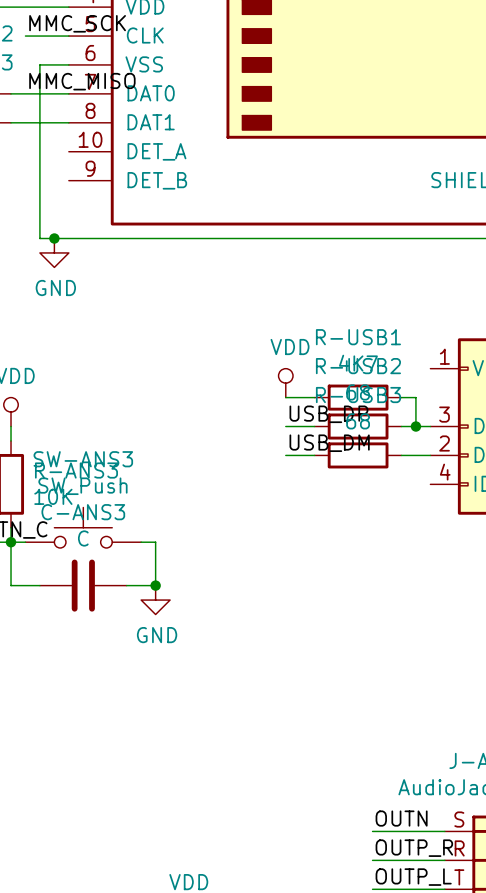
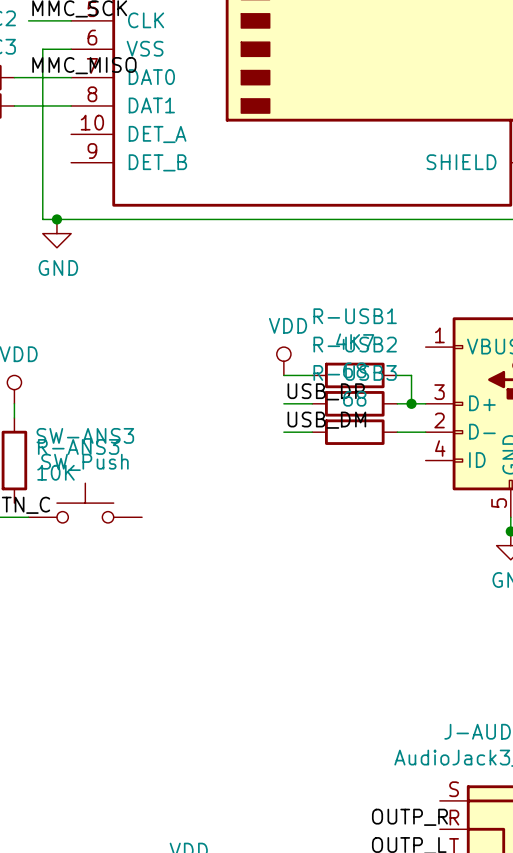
wire: (11, 527) (11, 585) (39, 585) -> none
junction: (11, 542) -> none
wire: (141, 542) (155, 542) (155, 585) (126, 585) -> none
C-ANS3: C (83, 585) -> none
junction: (155, 585) -> none
power symbol: GND (155, 600) -> none
label: OUTN (401, 818) -> none
wire: (372, 831) (444, 831) -> none
wire: (372, 860) (444, 860) -> none

